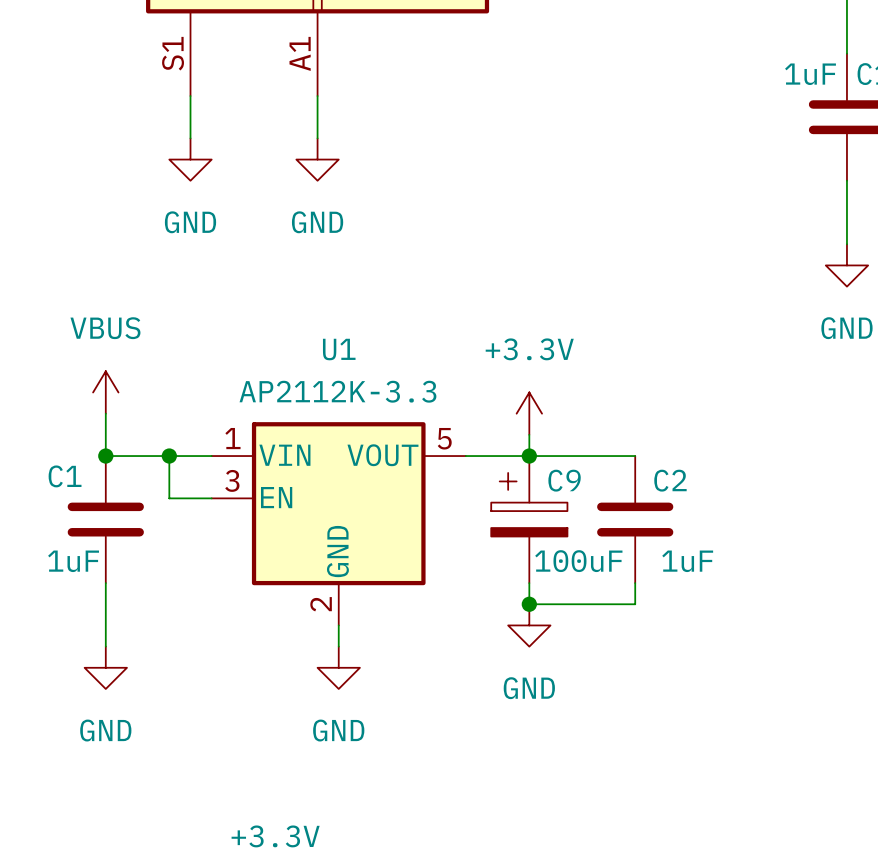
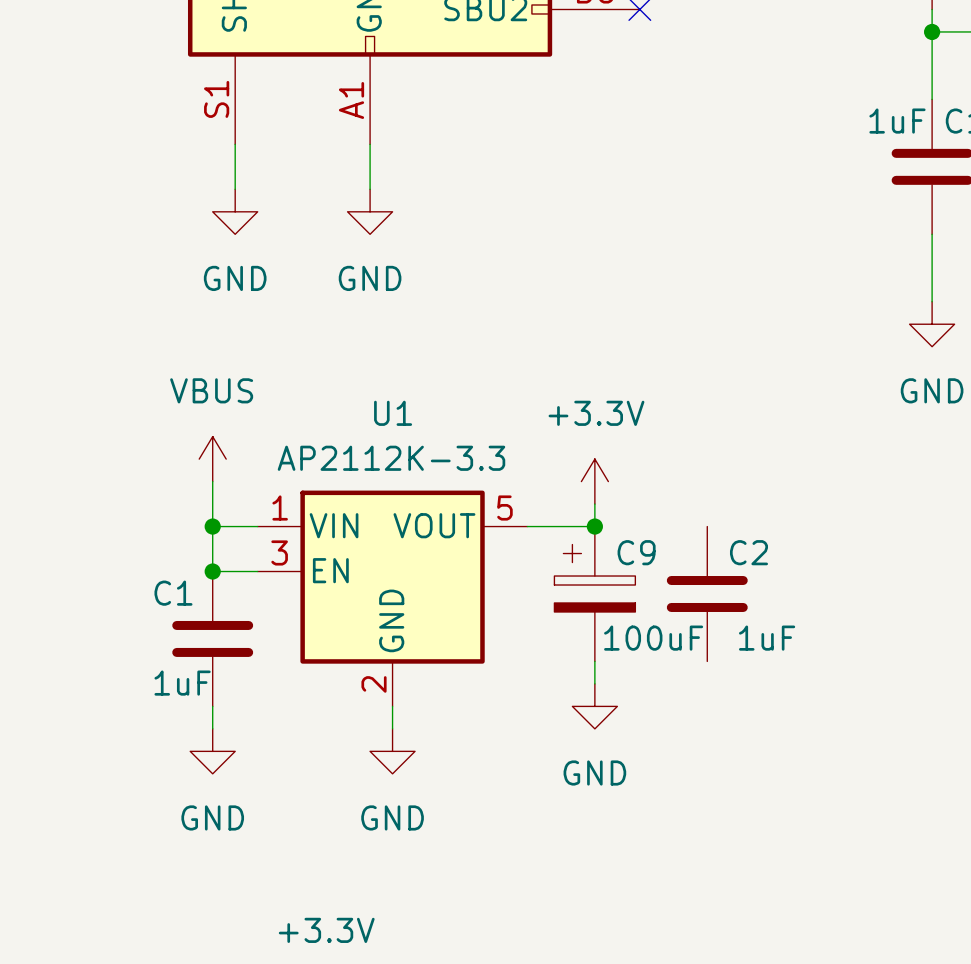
power symbol position: VBUS (105, 392) -> VBUS (212, 459)
wire: (105, 413) (105, 456) (169, 456) -> (212, 481) (212, 526)
junction position: (105, 456) -> (212, 571)
wire: (529, 456) (635, 456) -> none
C1 position: (105, 519) -> (212, 638)
wire: (105, 583) (105, 646) -> none
wire: (635, 583) (635, 604) (529, 604) -> none
junction: (529, 604) -> none
wire: none -> (212, 706) (212, 728)
power symbol position: GND (105, 667) -> GND (212, 751)

